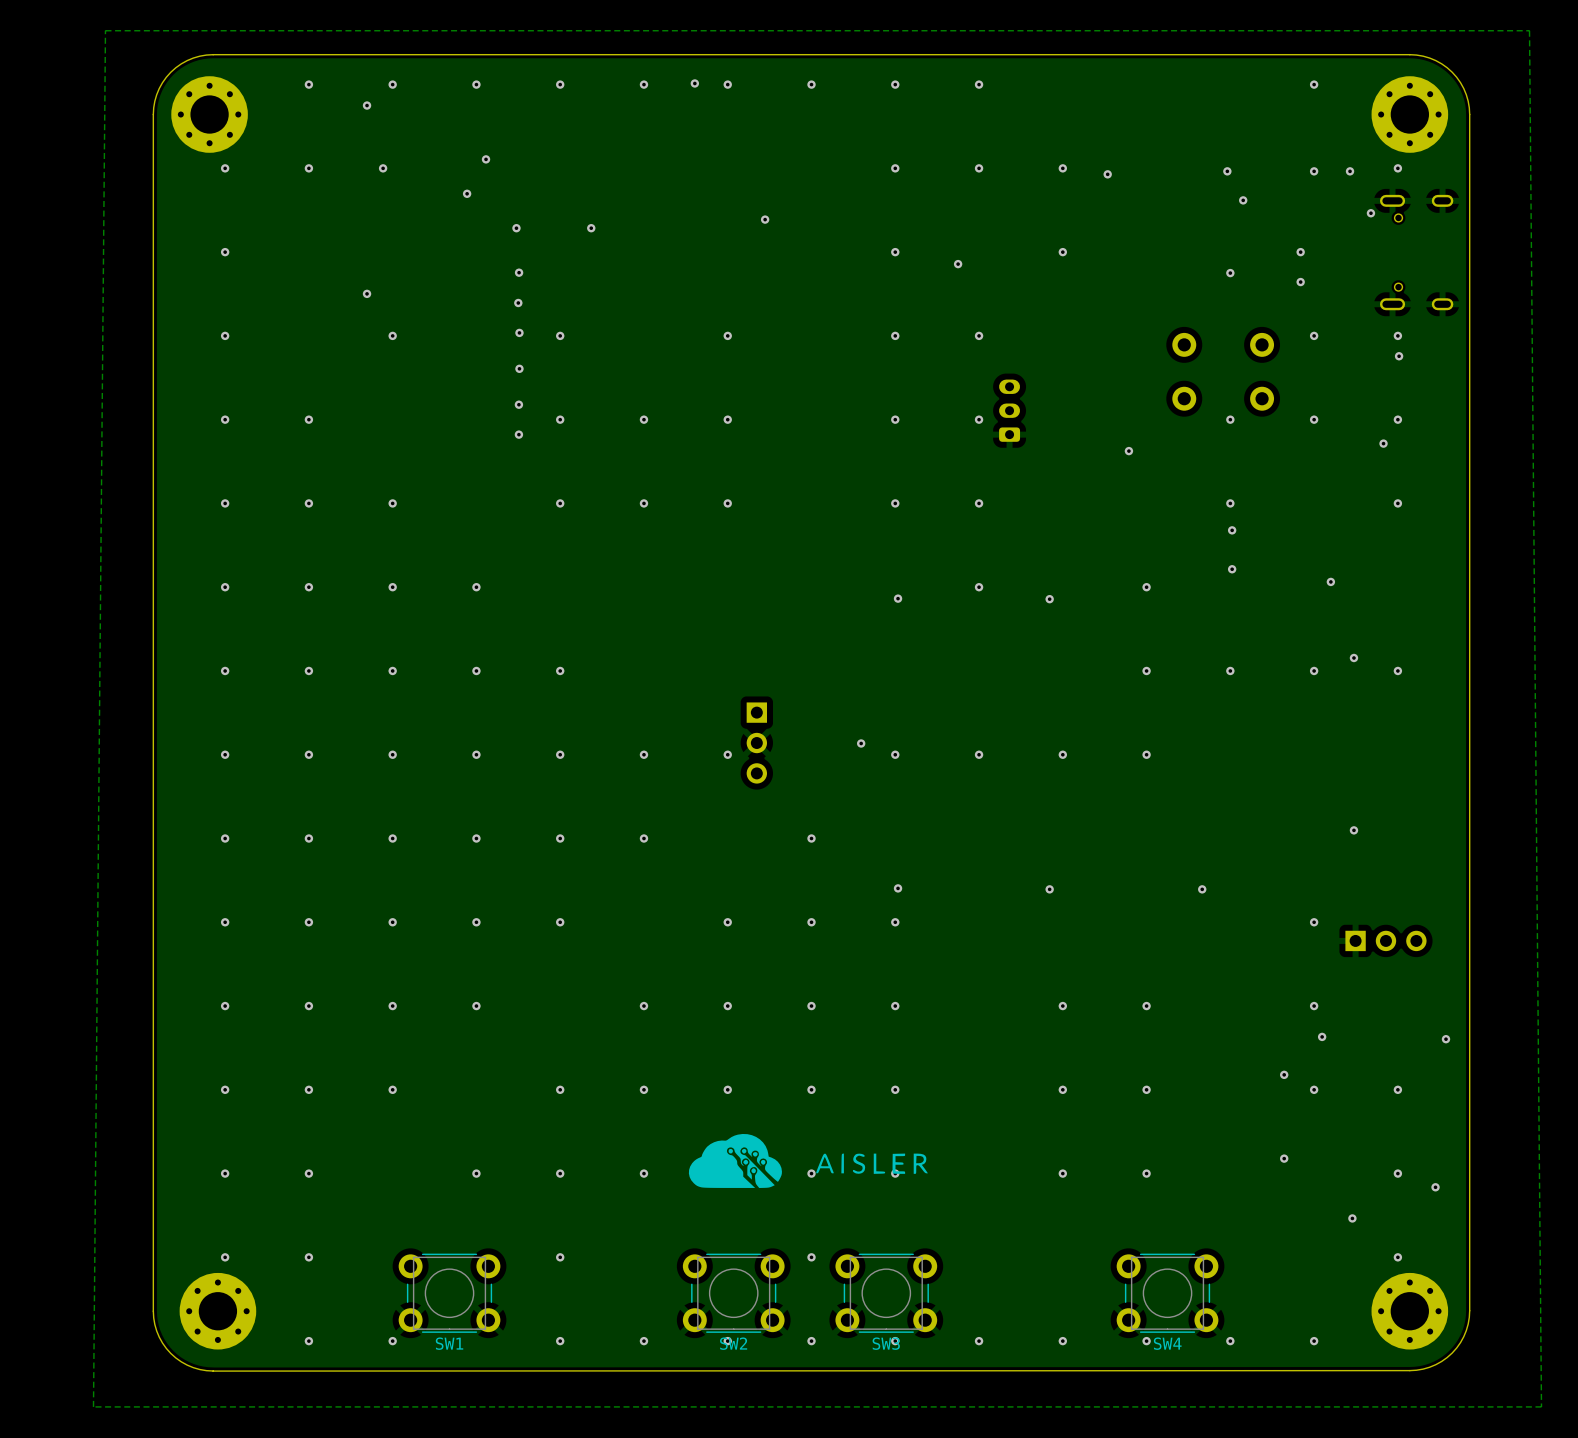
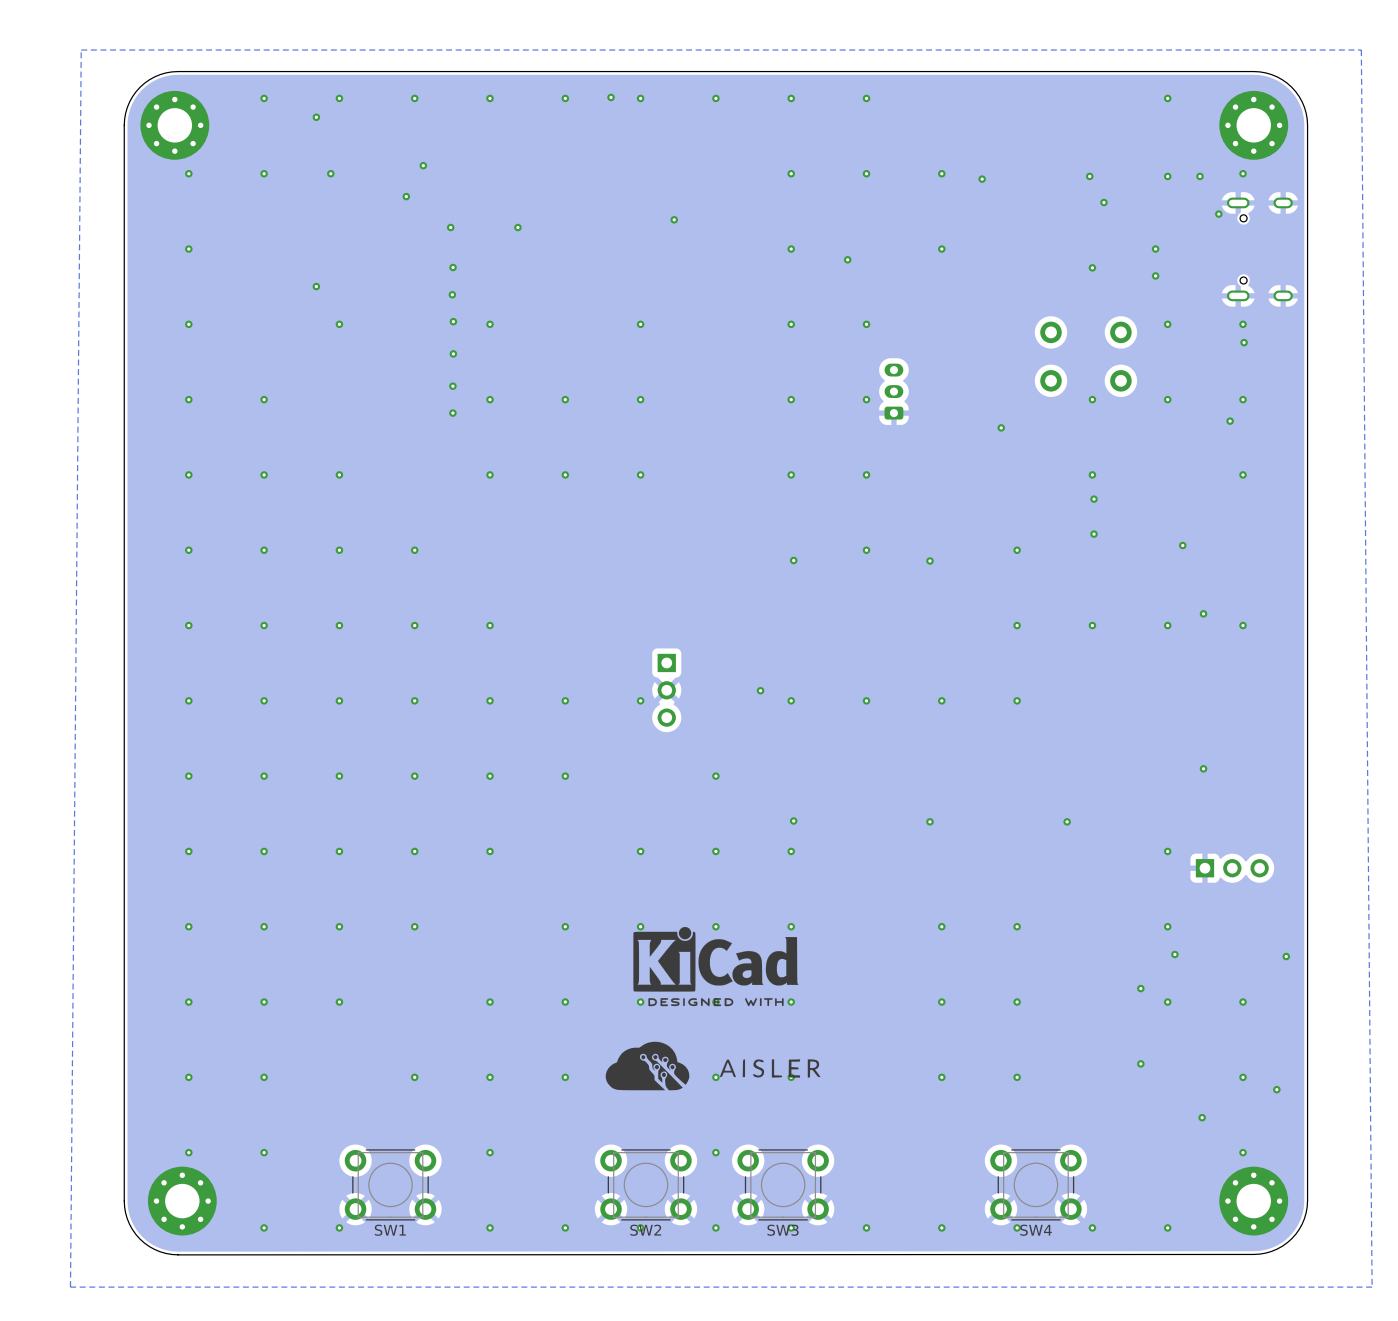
drawing: none -> [633, 926, 799, 1007]

